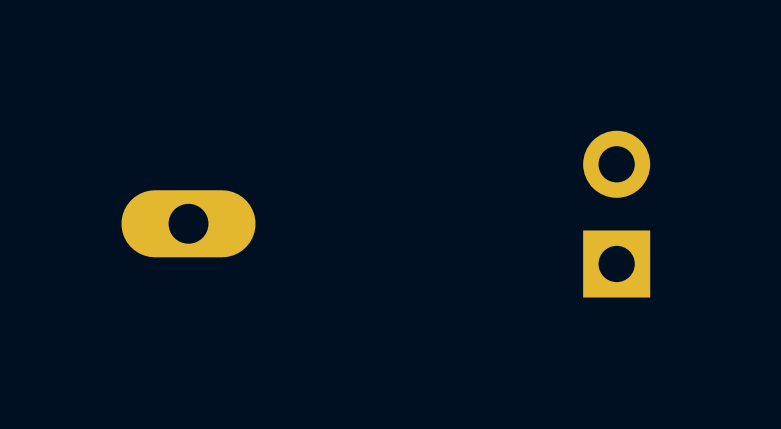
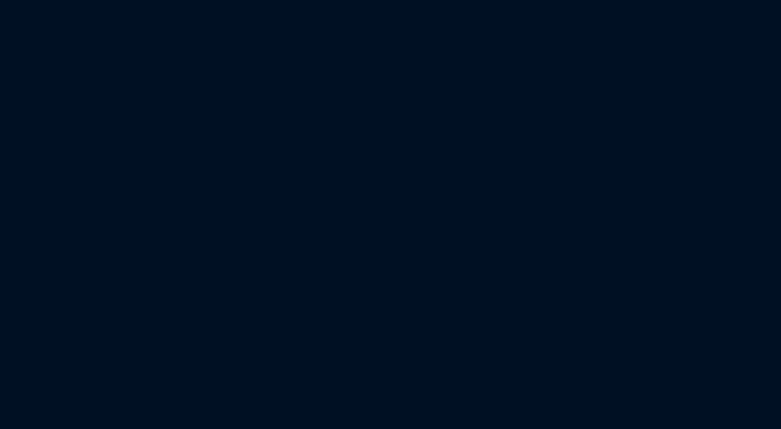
part: (616, 214) -> none
part: (188, 223) -> none

